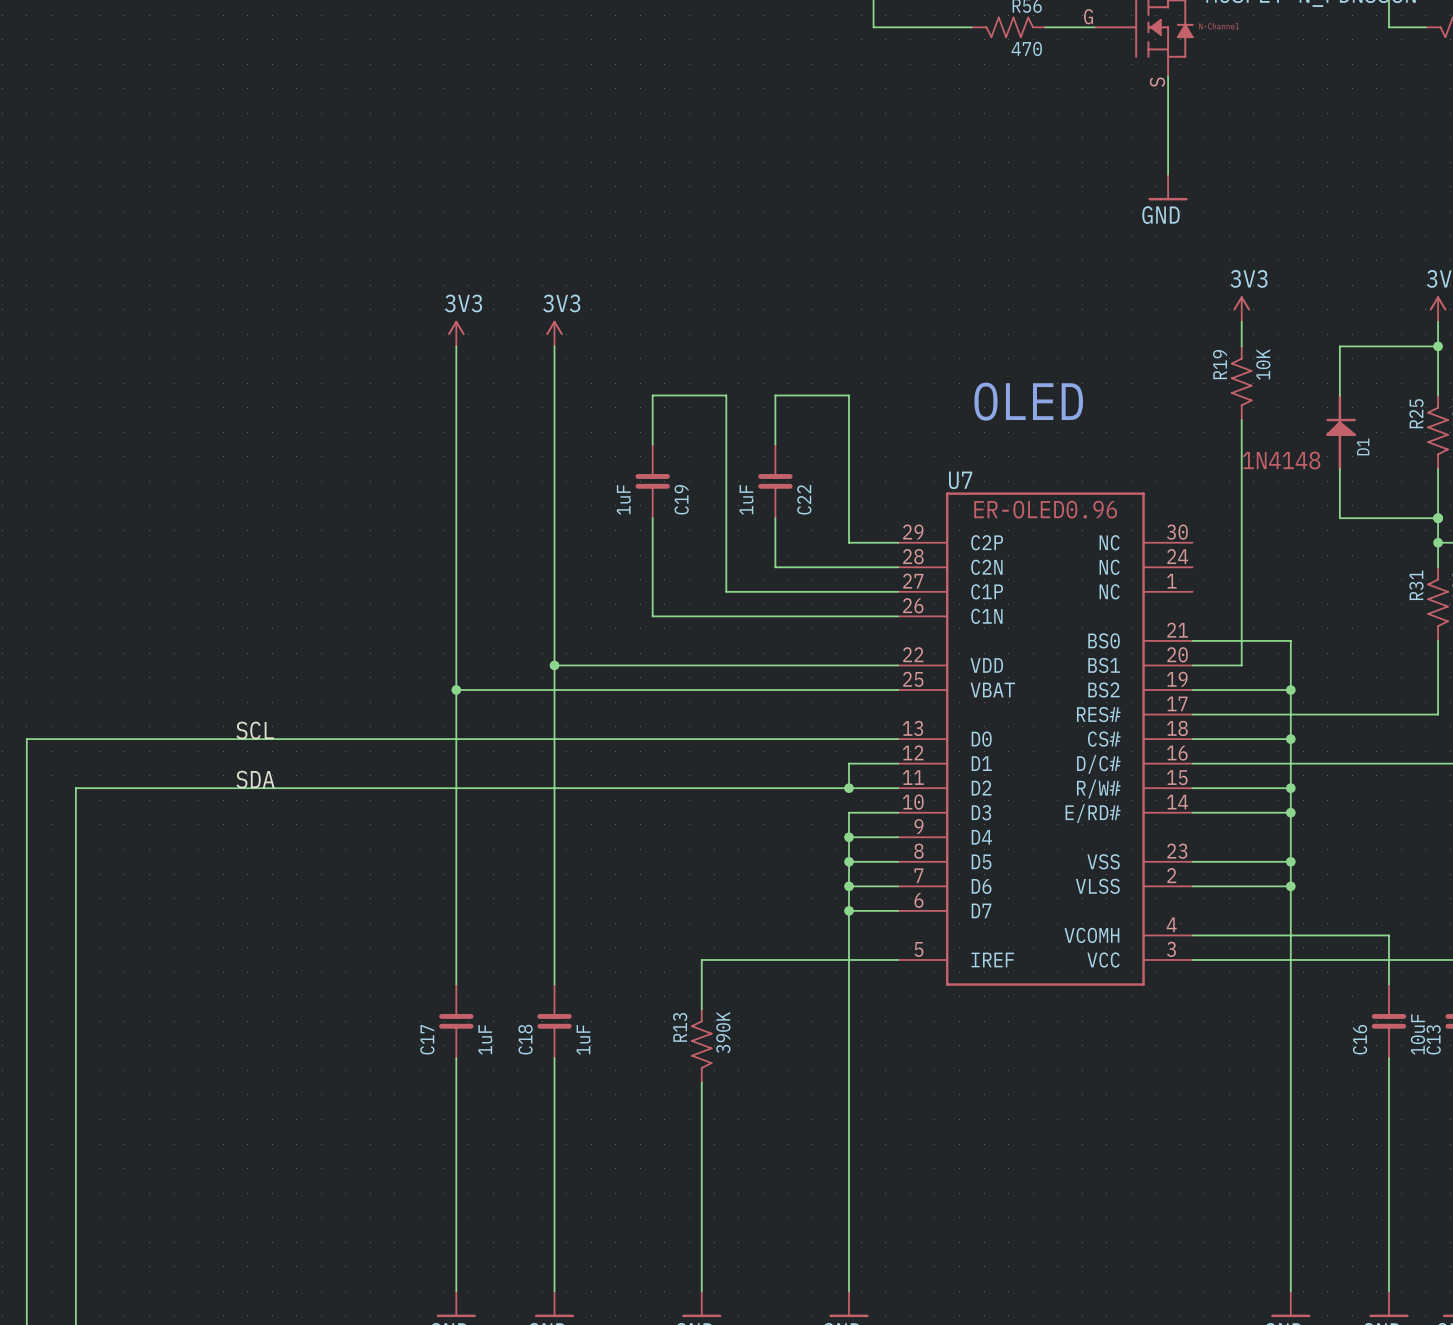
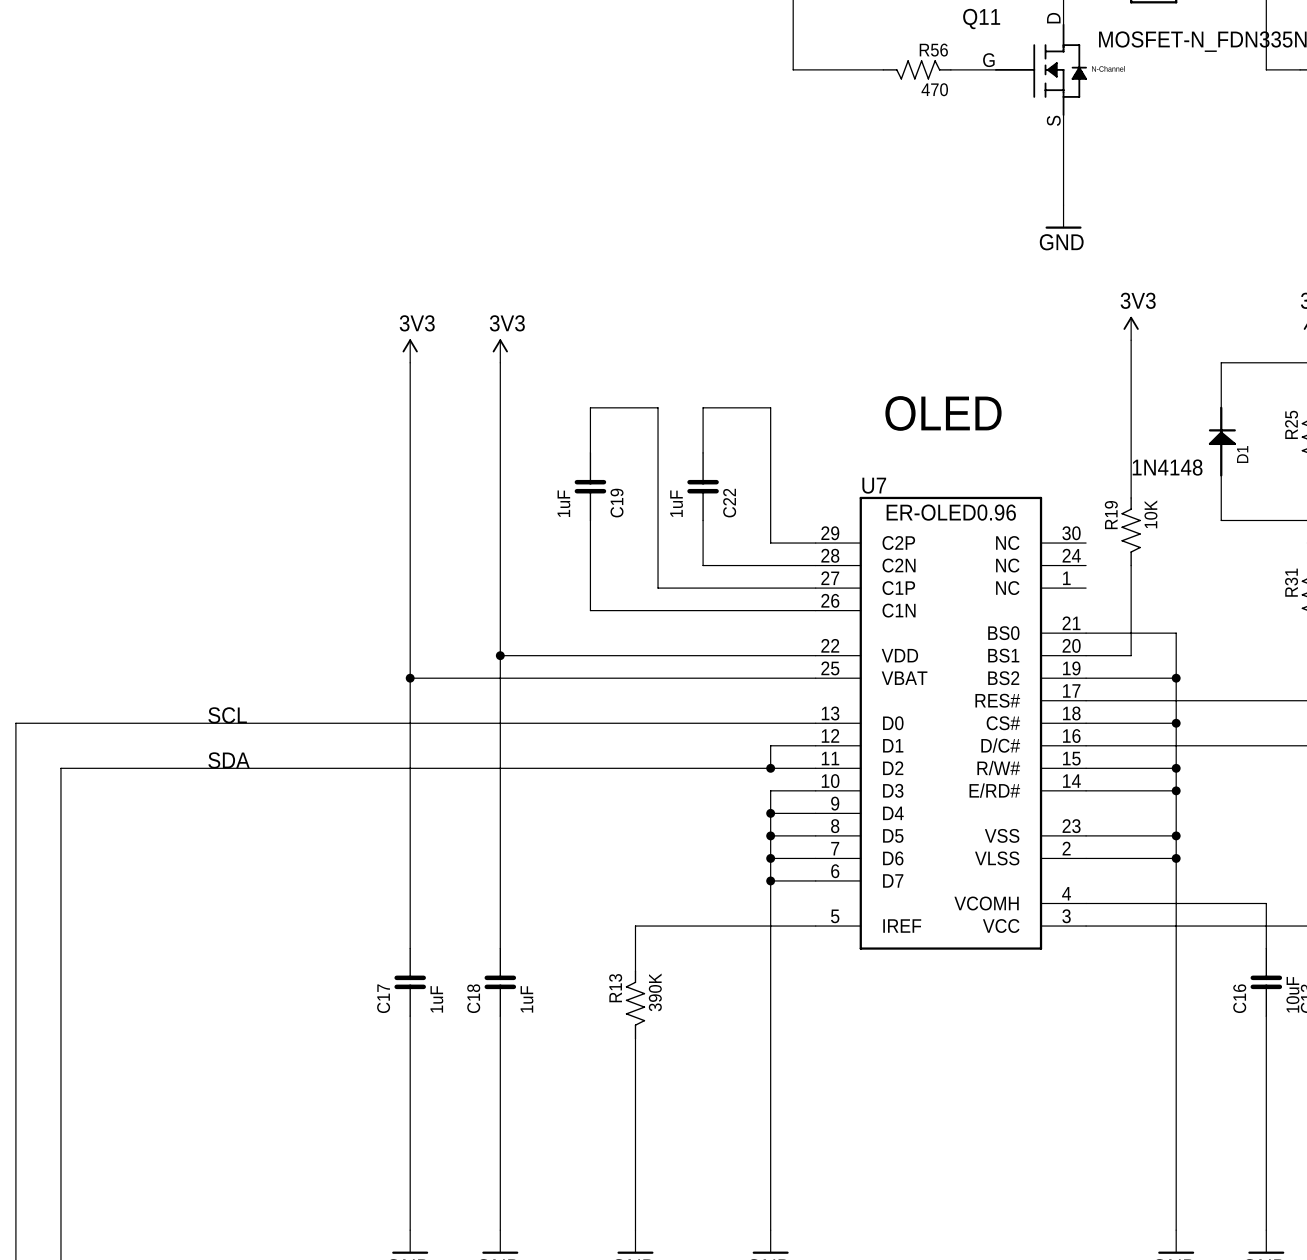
R19 position: (1241, 383) -> (1131, 531)

